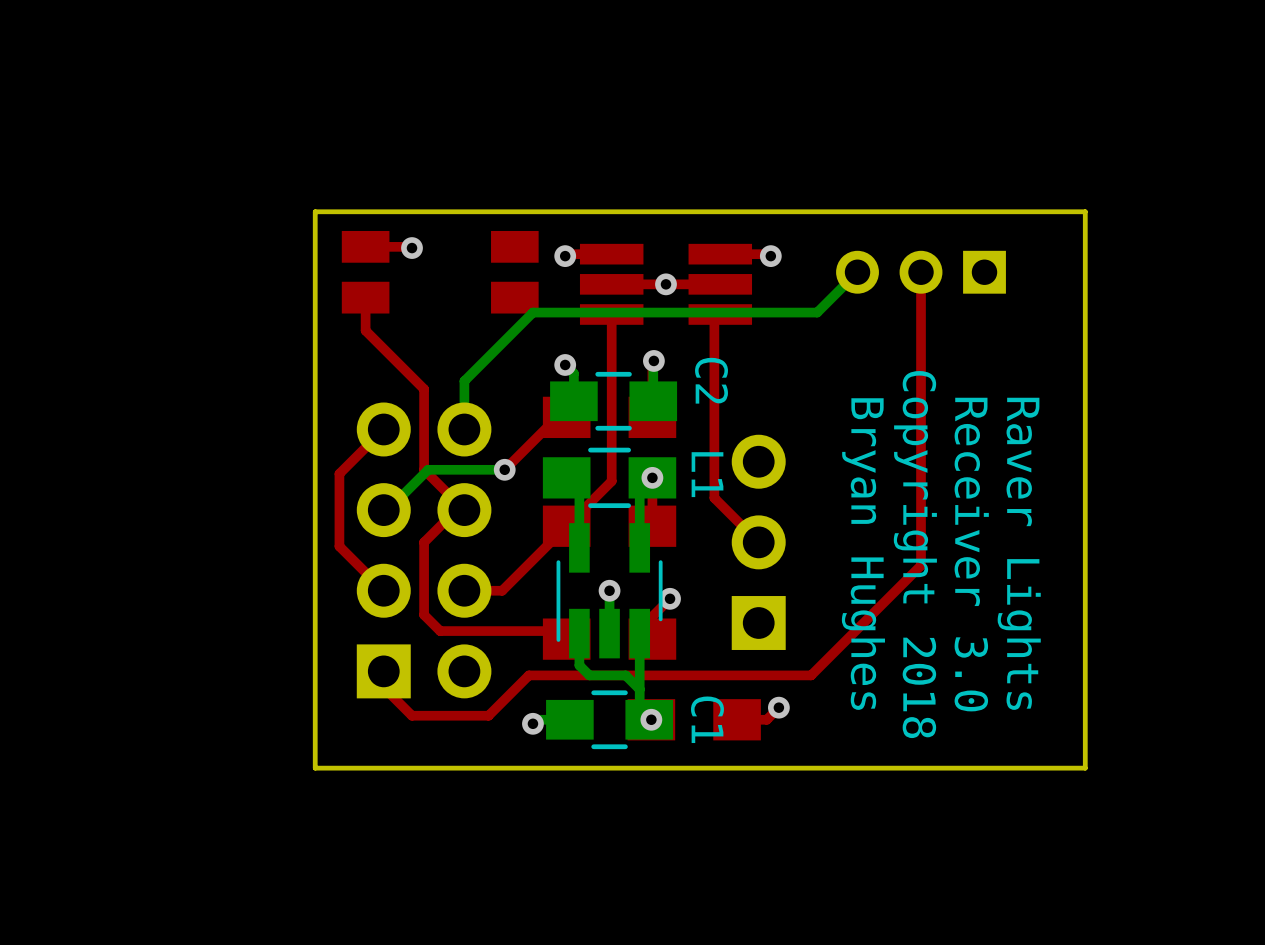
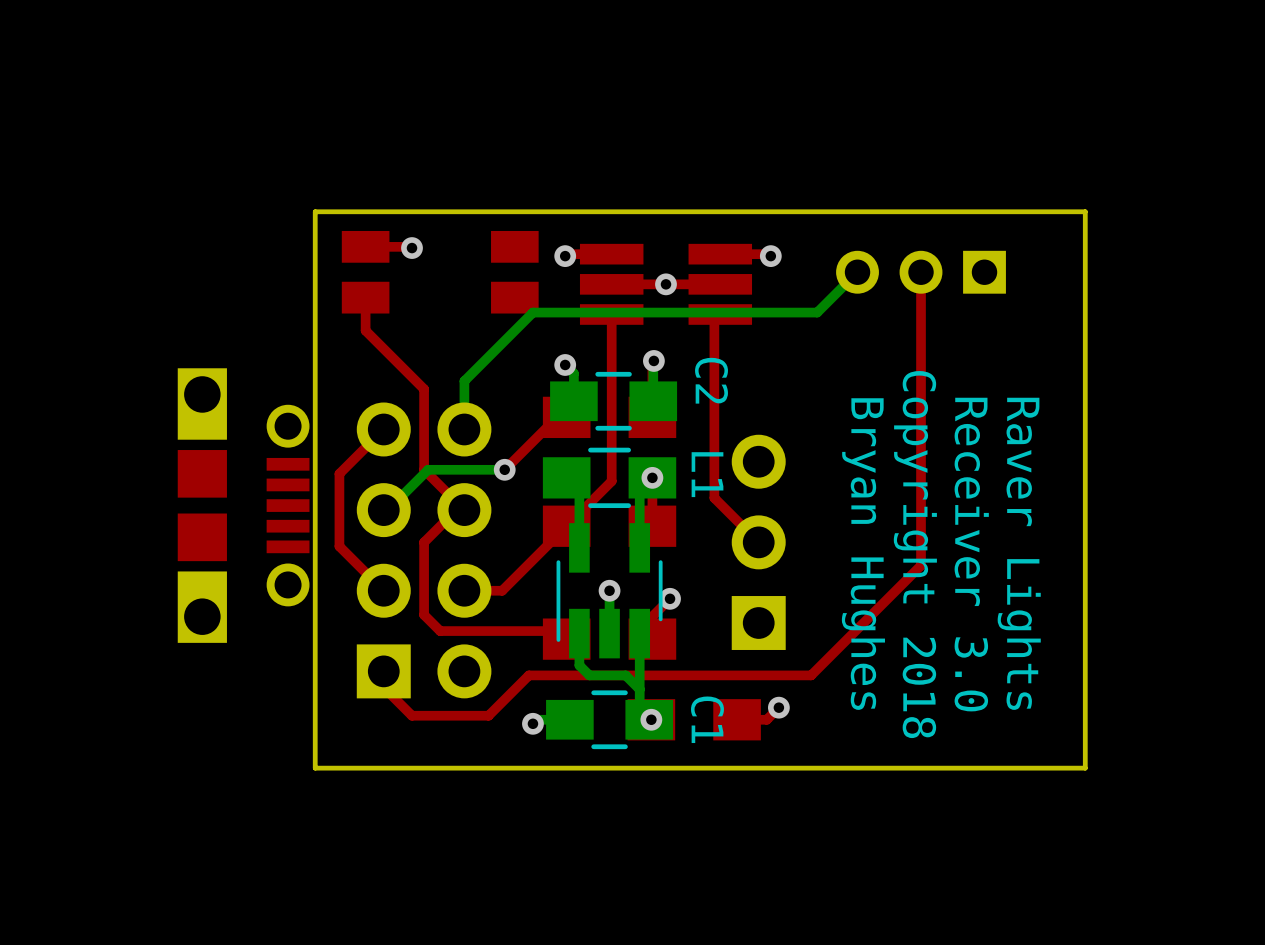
part: none -> (243, 505)

